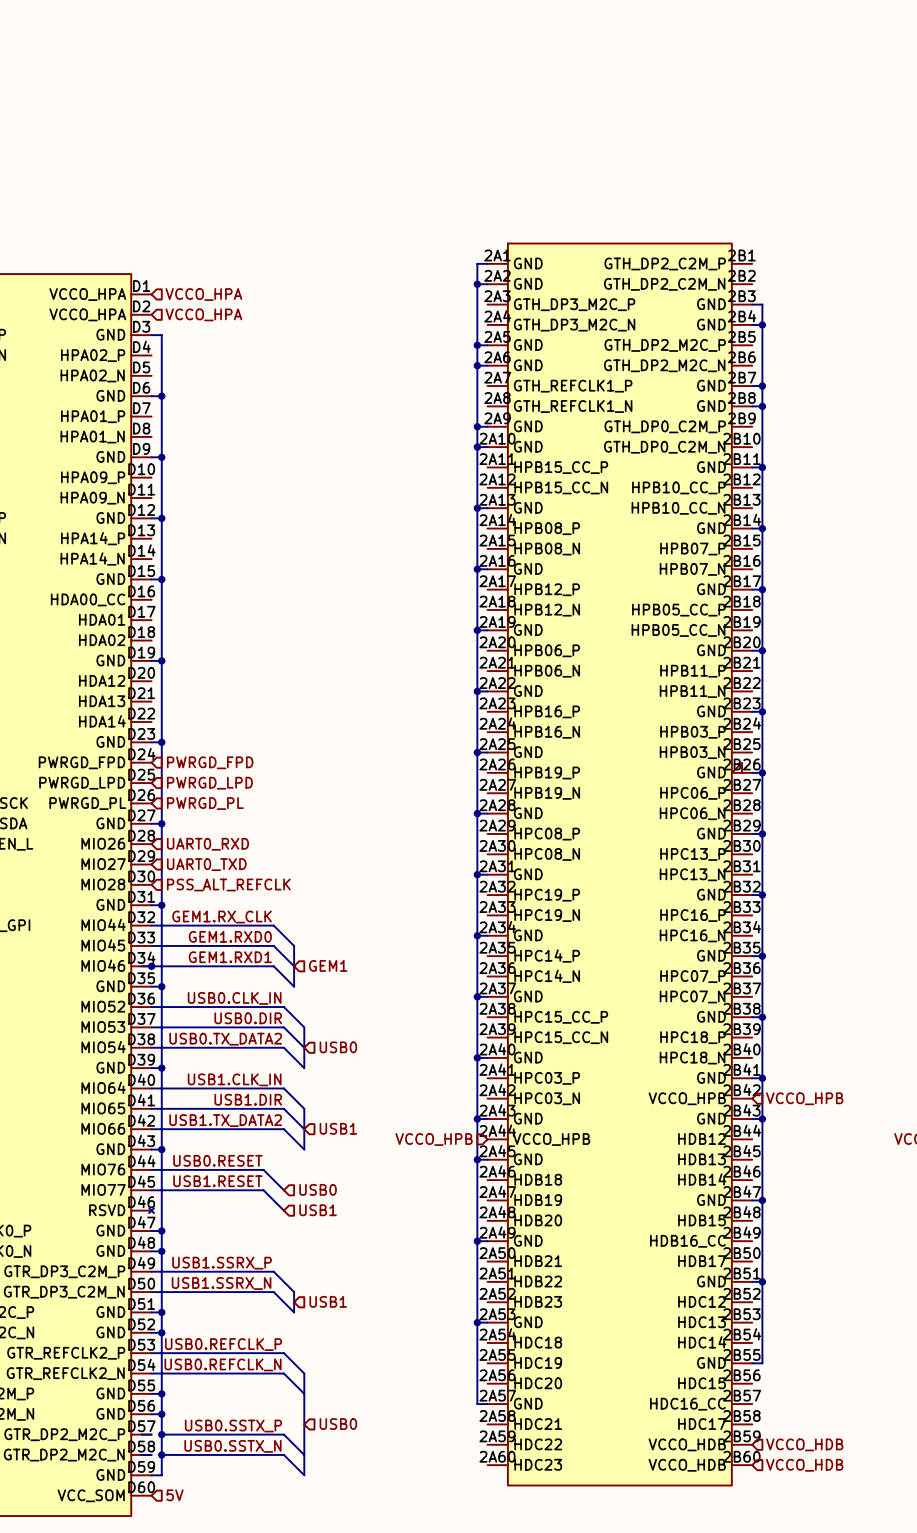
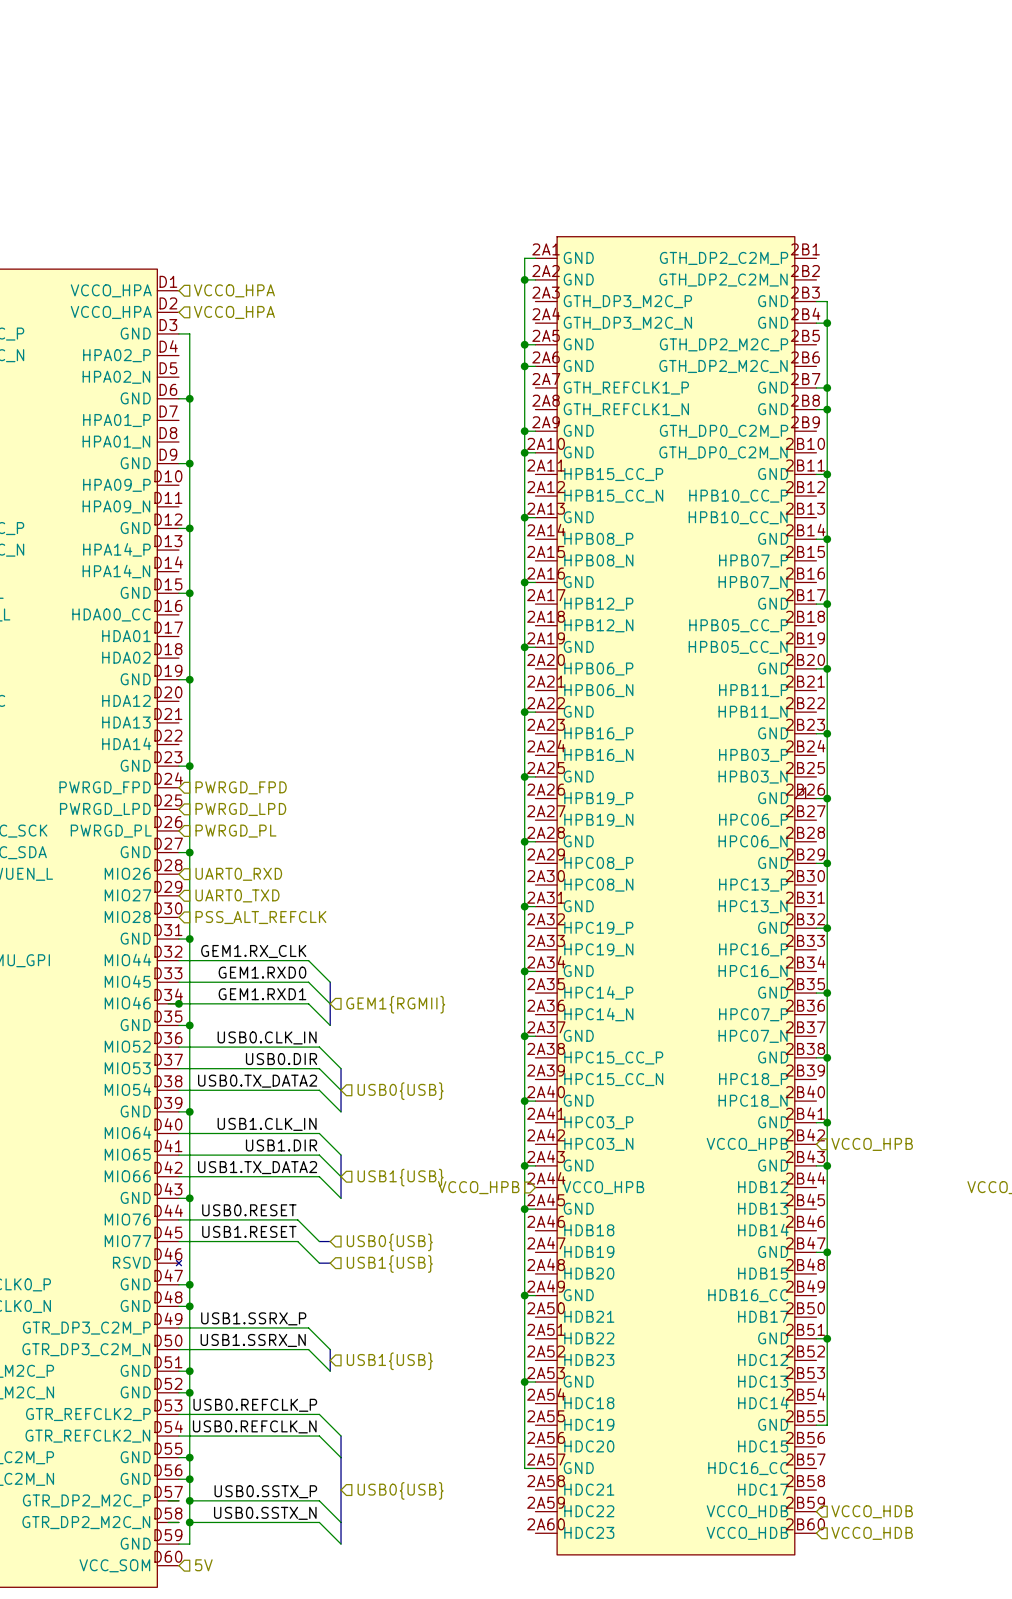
hierarchical label: GEM1 (328, 965) -> GEM1{RGMII} (395, 1004)
hierarchical label: USB0 (338, 1047) -> USB0{USB} (400, 1091)
hierarchical label: USB1 (338, 1128) -> USB1{USB} (400, 1177)
hierarchical label: USB0 (318, 1189) -> USB0{USB} (389, 1242)
bus: none -> (319, 1241) (330, 1241)
bus: none -> (319, 1263) (330, 1263)
hierarchical label: USB1 (318, 1210) -> USB1{USB} (389, 1264)
hierarchical label: USB1 (328, 1301) -> USB1{USB} (389, 1361)
hierarchical label: USB0 (338, 1424) -> USB0{USB} (400, 1490)

